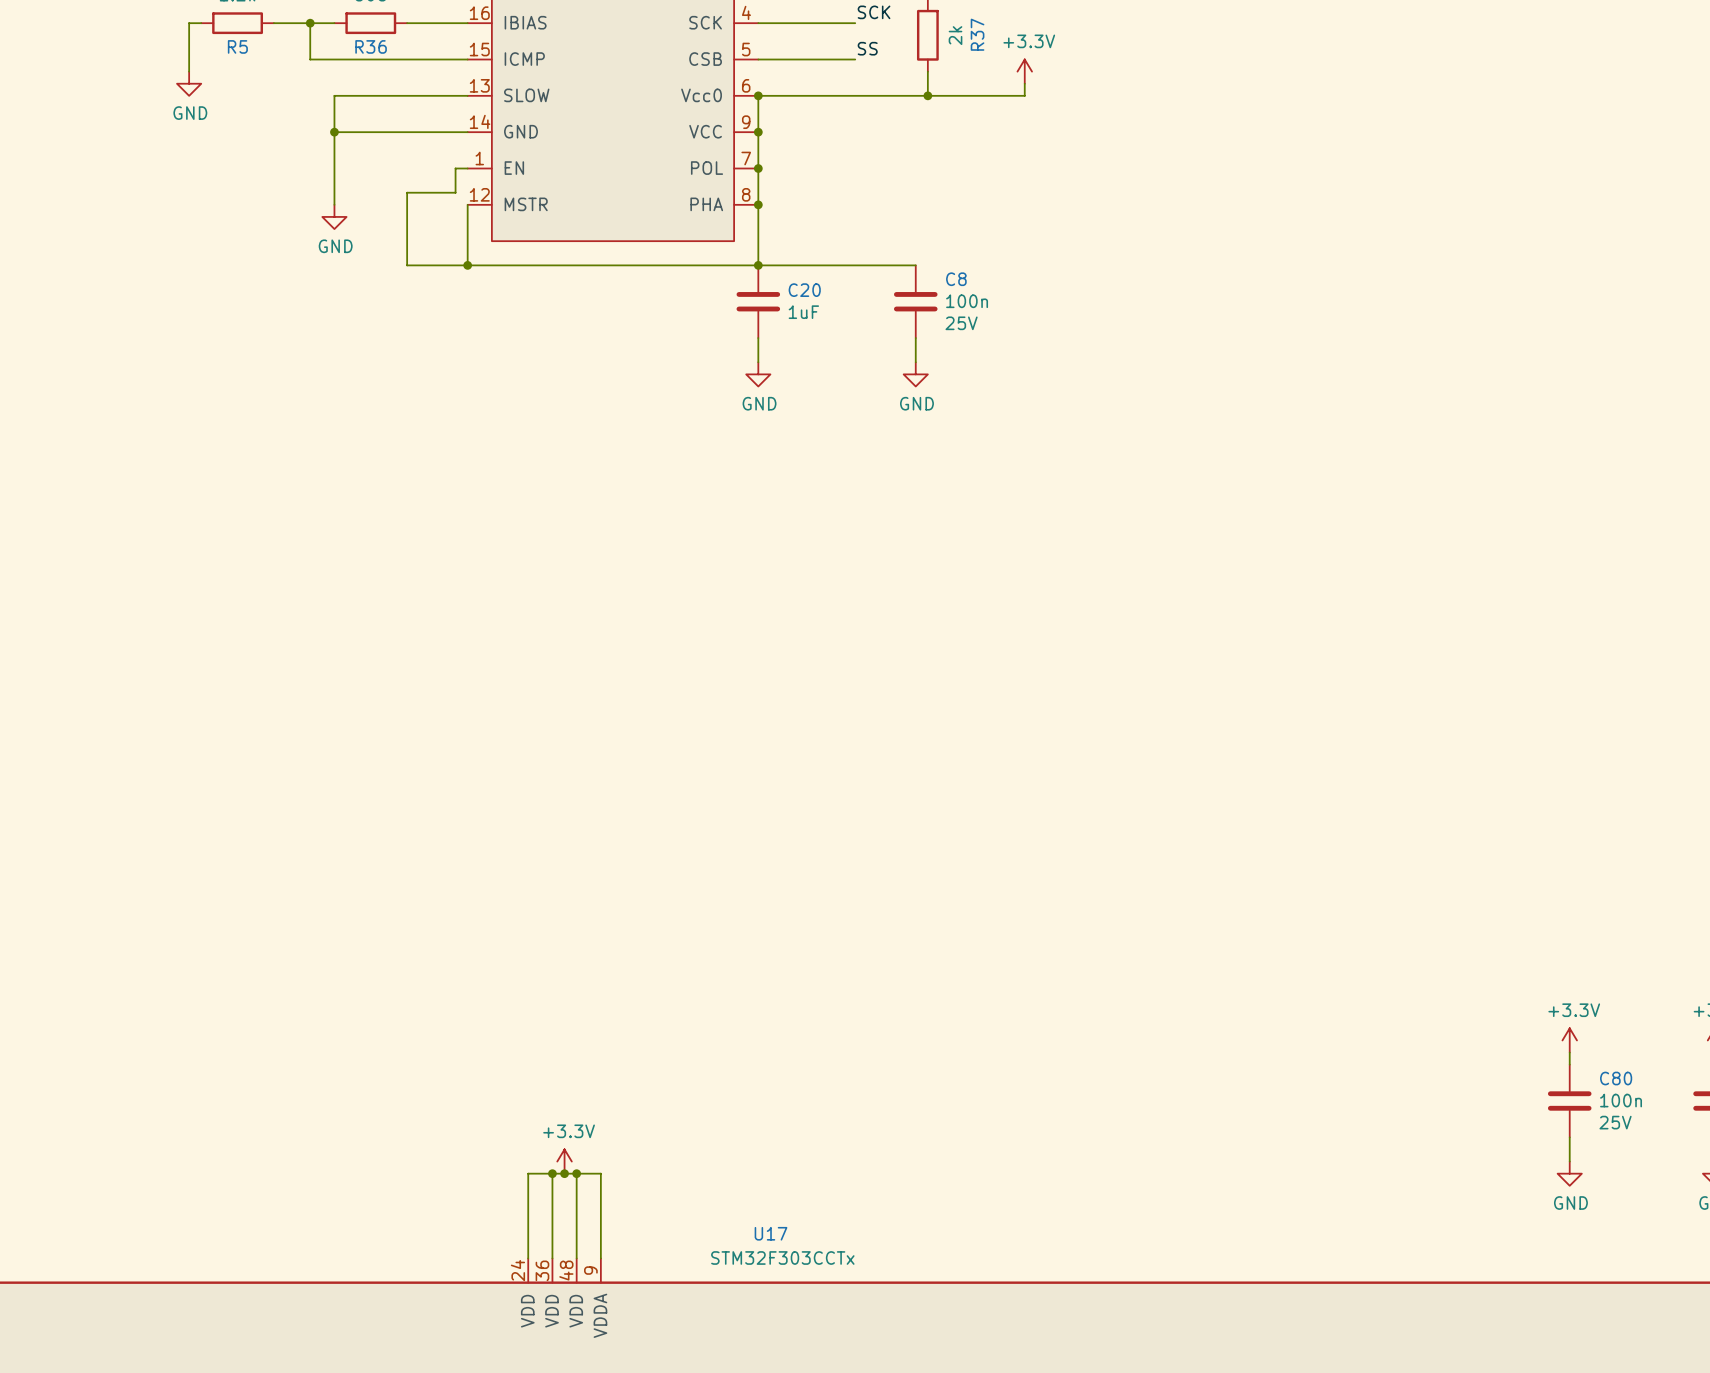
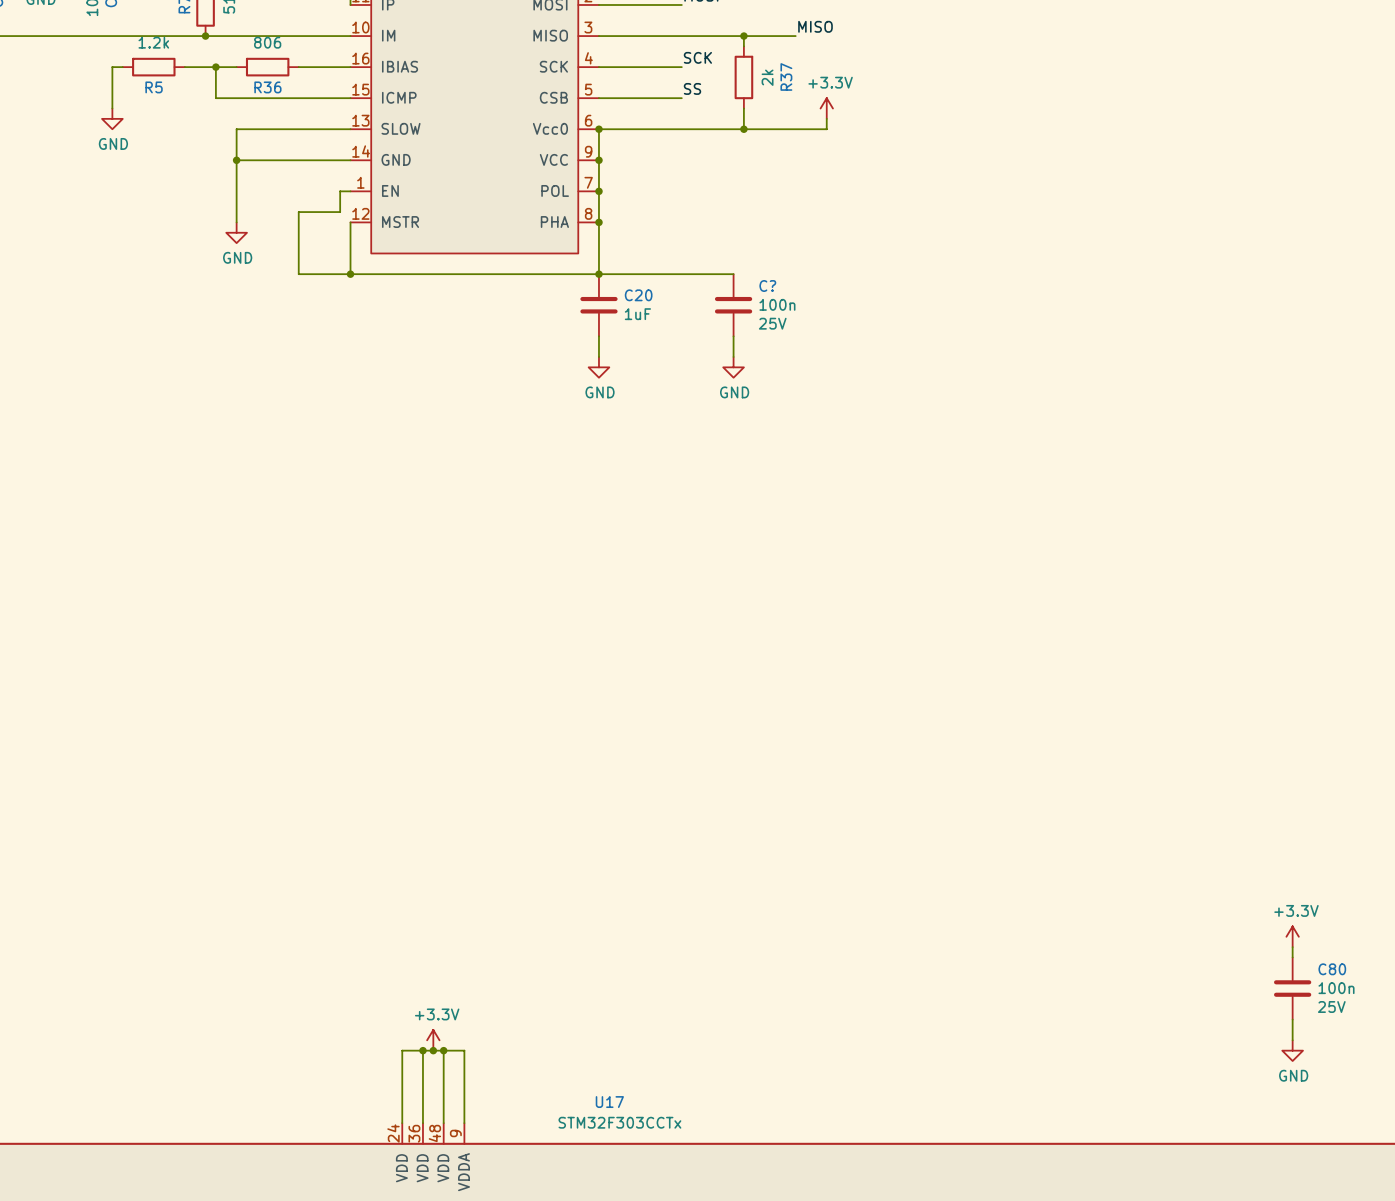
C8 name: C8 (956, 279) -> C? (767, 286)

